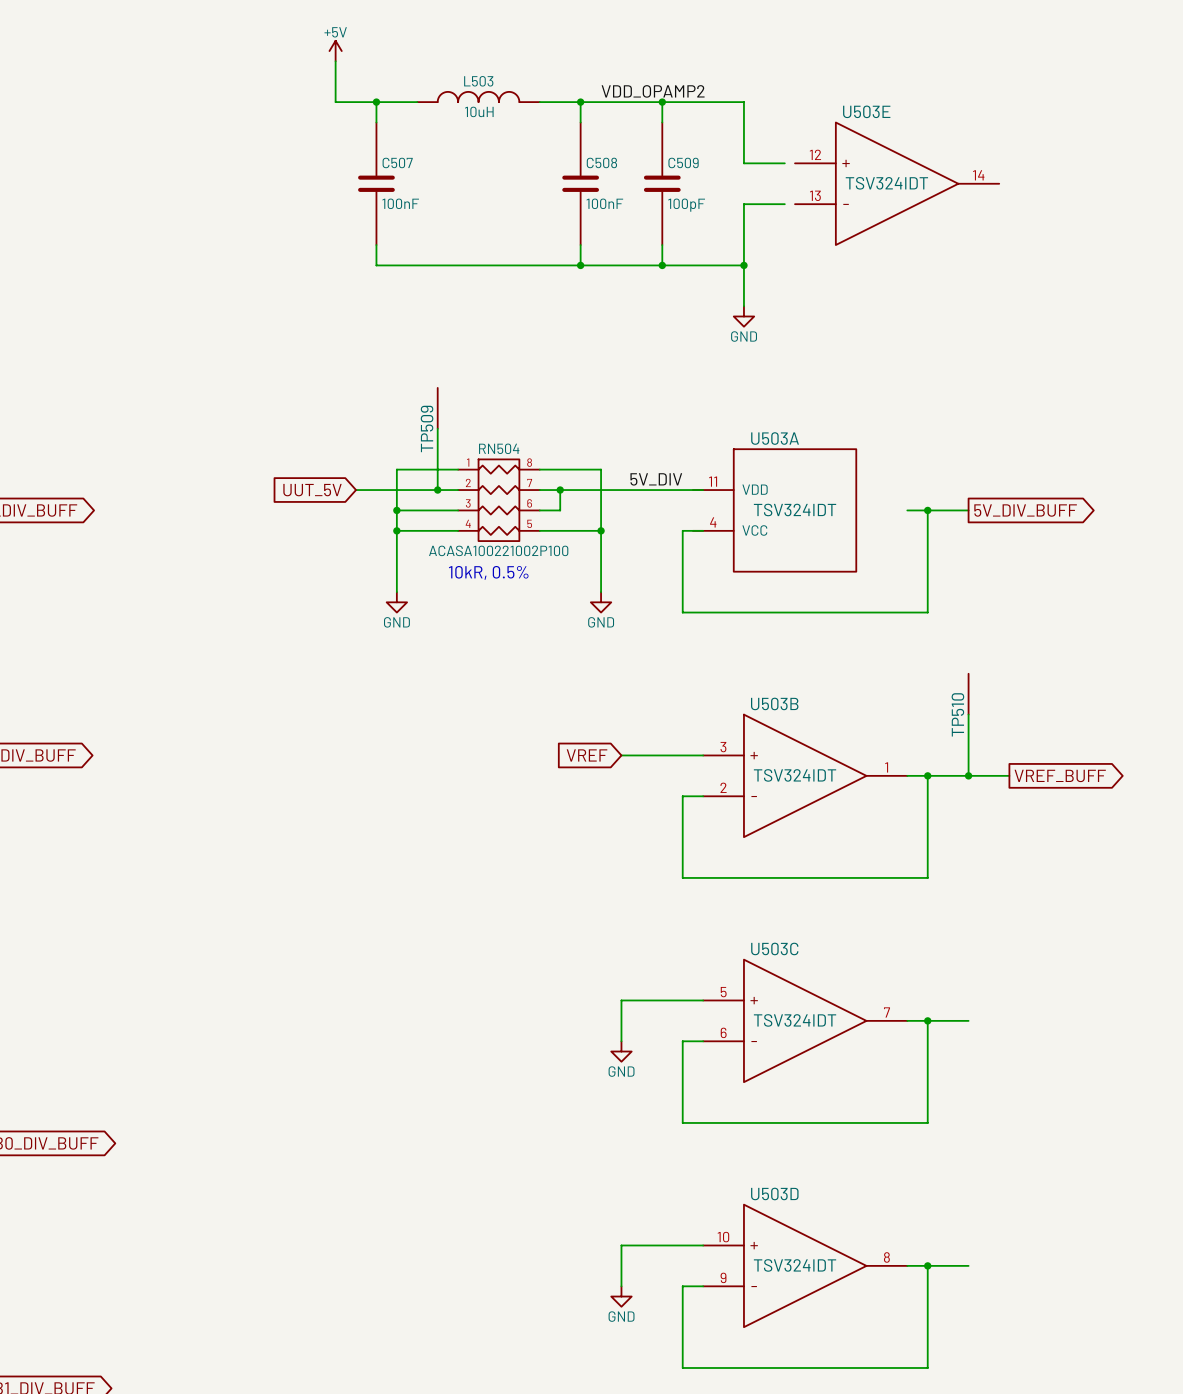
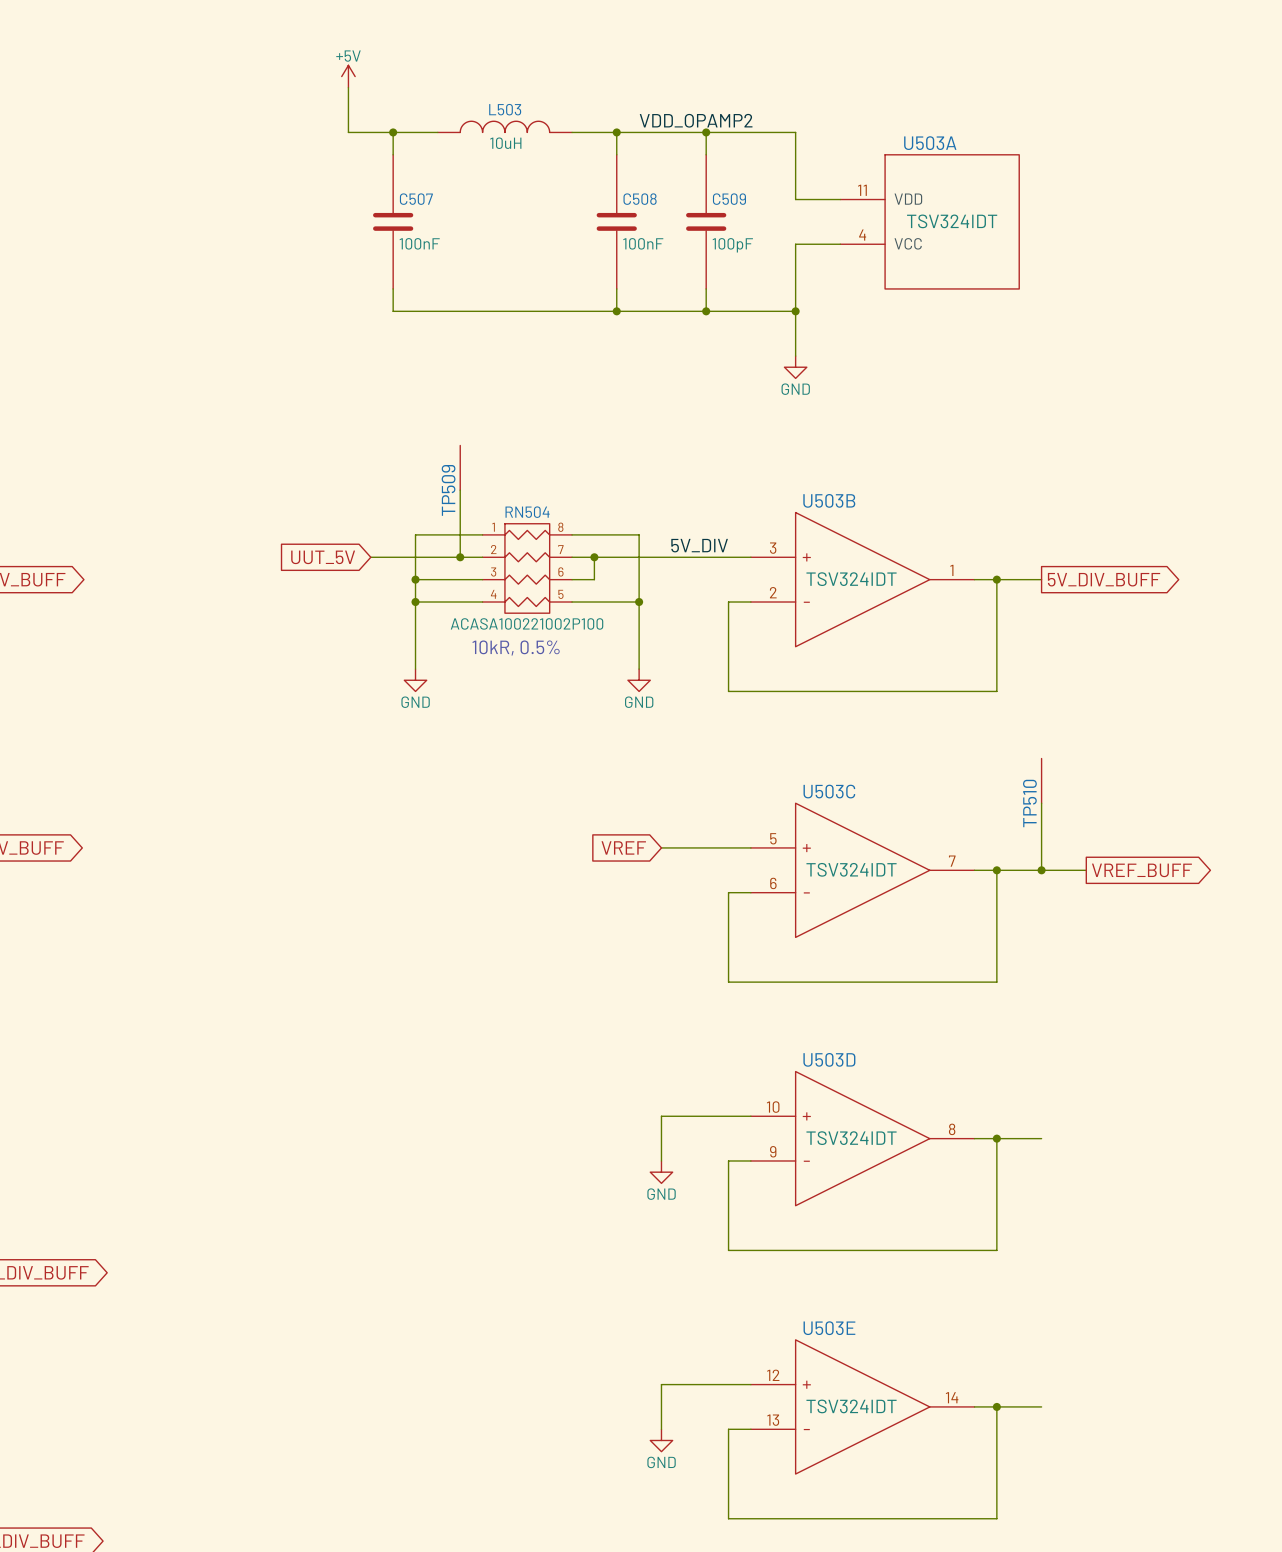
U503E position: (897, 183) -> (862, 1406)
U503A position: (774, 510) -> (929, 221)
U503B position: (805, 775) -> (862, 579)
U503C position: (805, 1020) -> (862, 870)
U503D position: (805, 1265) -> (862, 1138)

